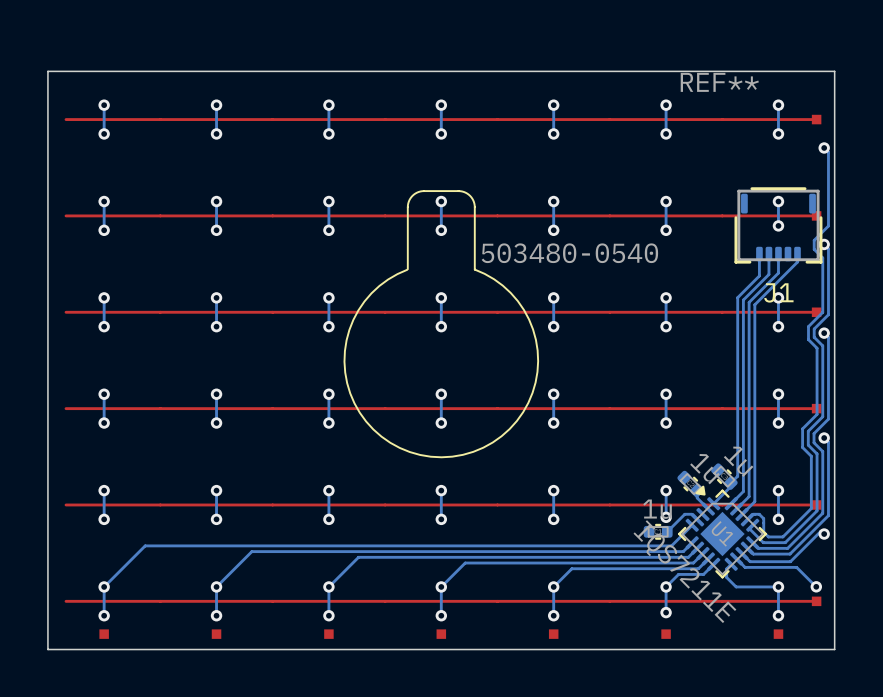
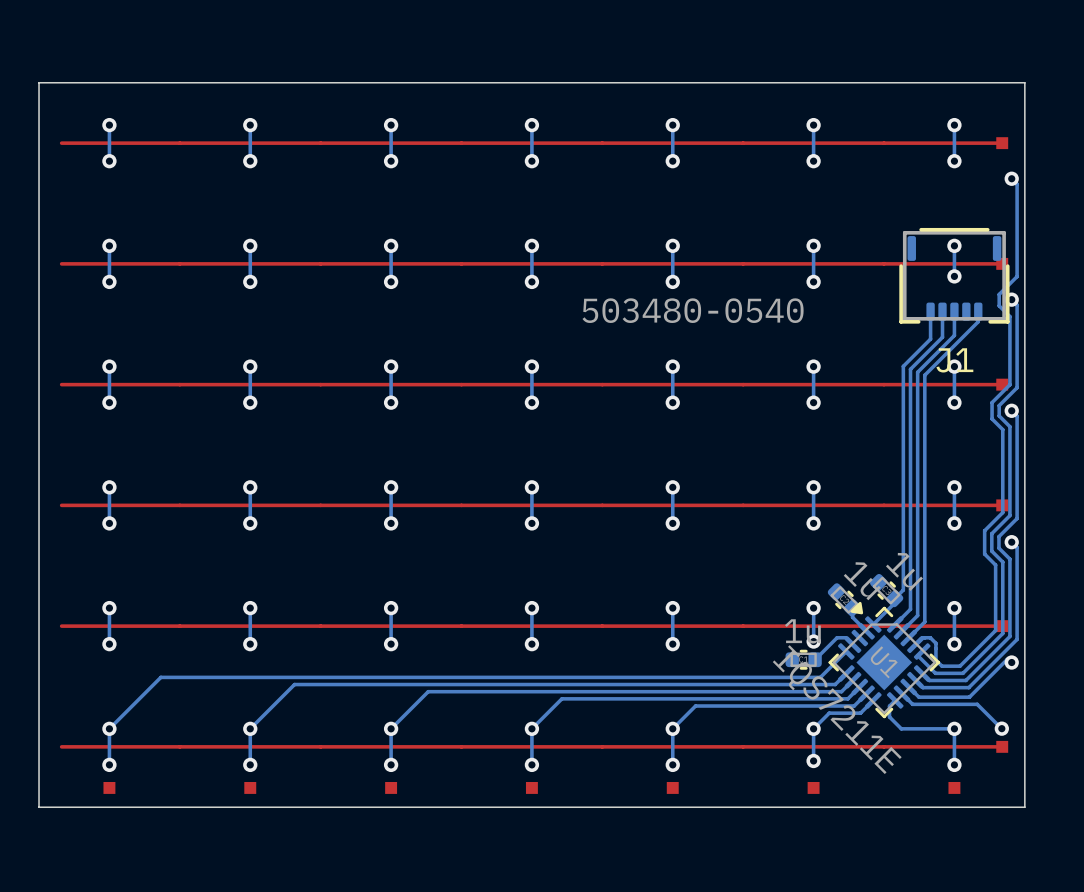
REF**: (441, 324) -> none

